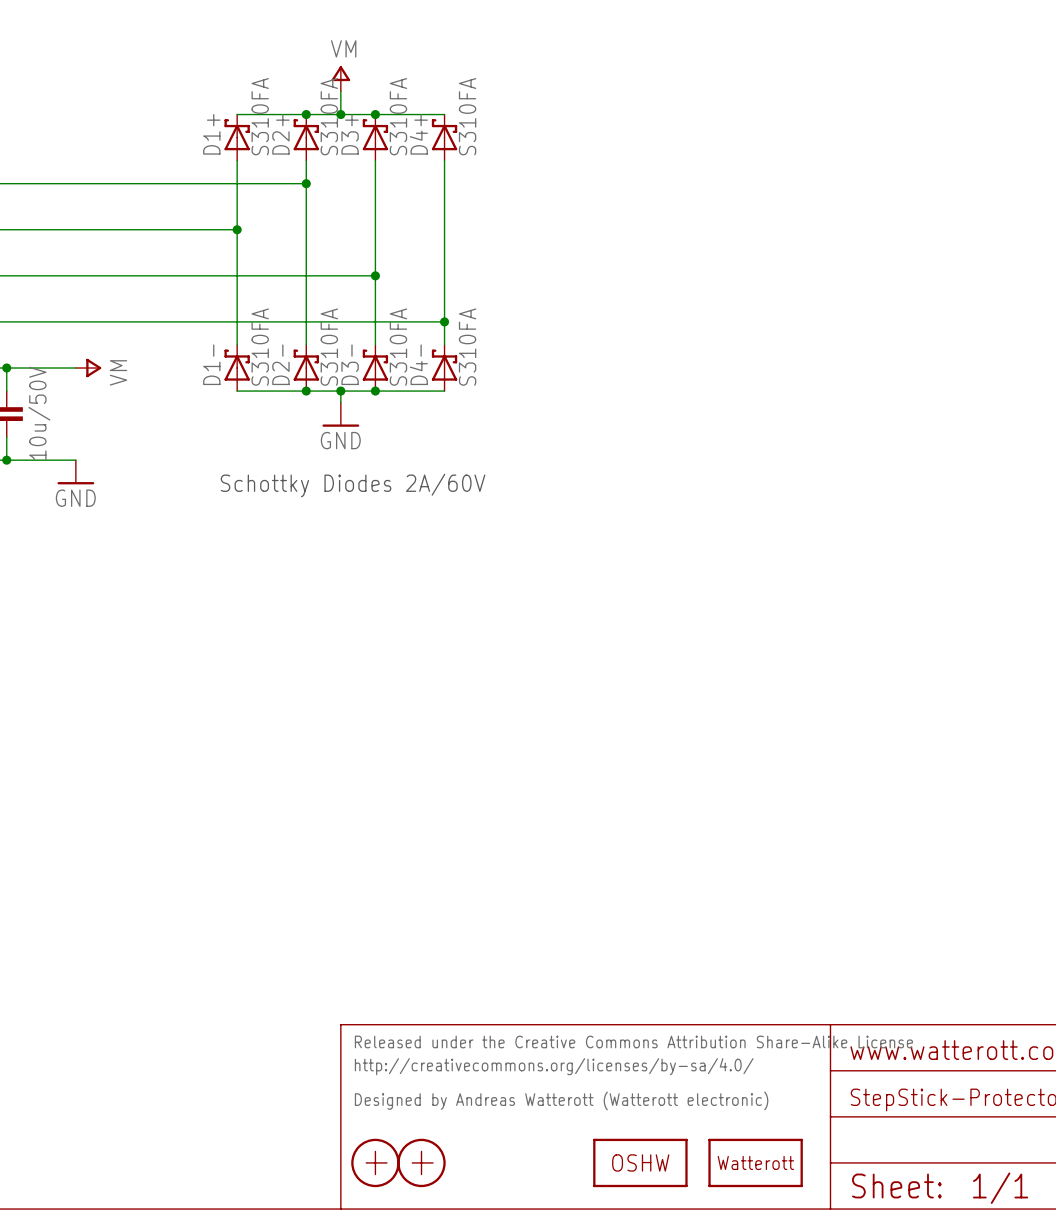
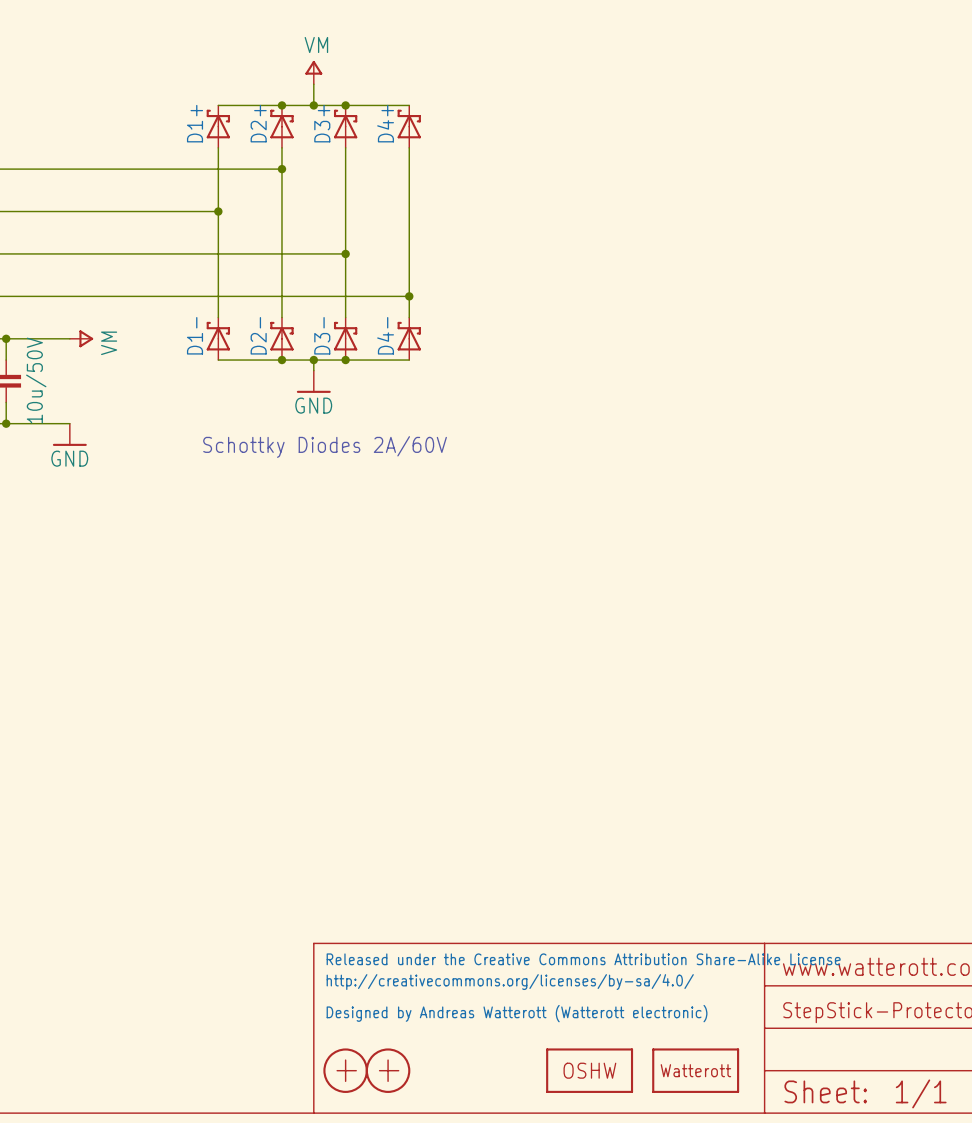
D1+ value: S310FA (260, 116) -> none
D2+ value: S310FA (329, 116) -> none
D3+ value: S310FA (398, 116) -> none
D4+ value: S310FA (467, 116) -> none
D1- value: S310FA (260, 347) -> none
D2- value: S310FA (329, 347) -> none
D3- value: S310FA (398, 347) -> none
D4- value: S310FA (467, 347) -> none

